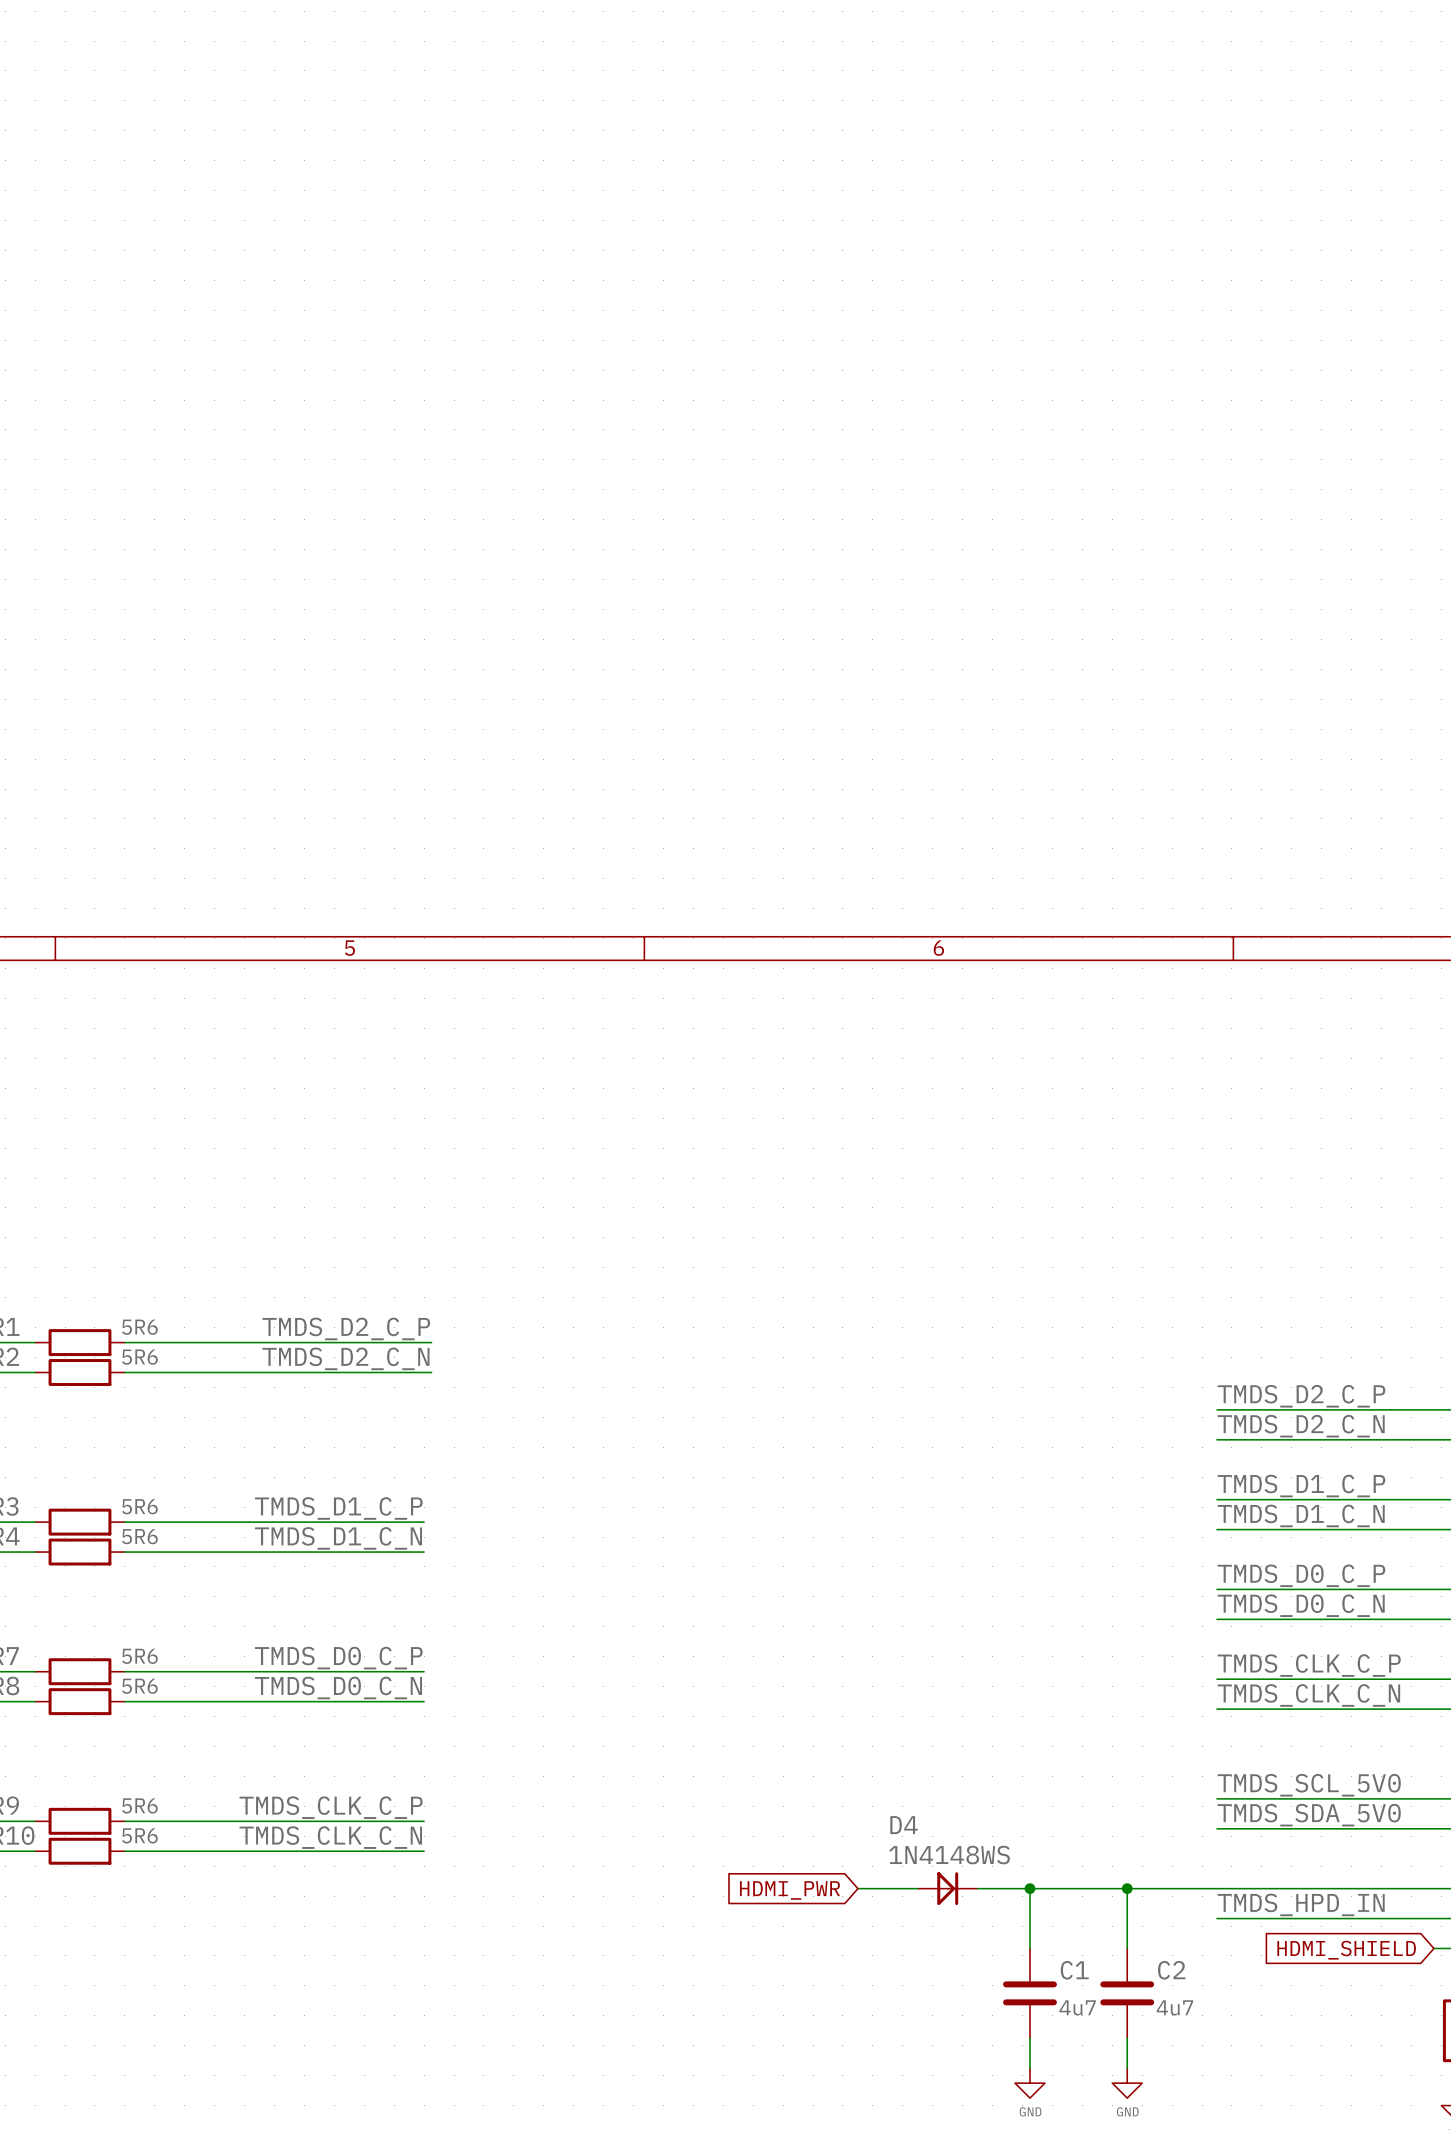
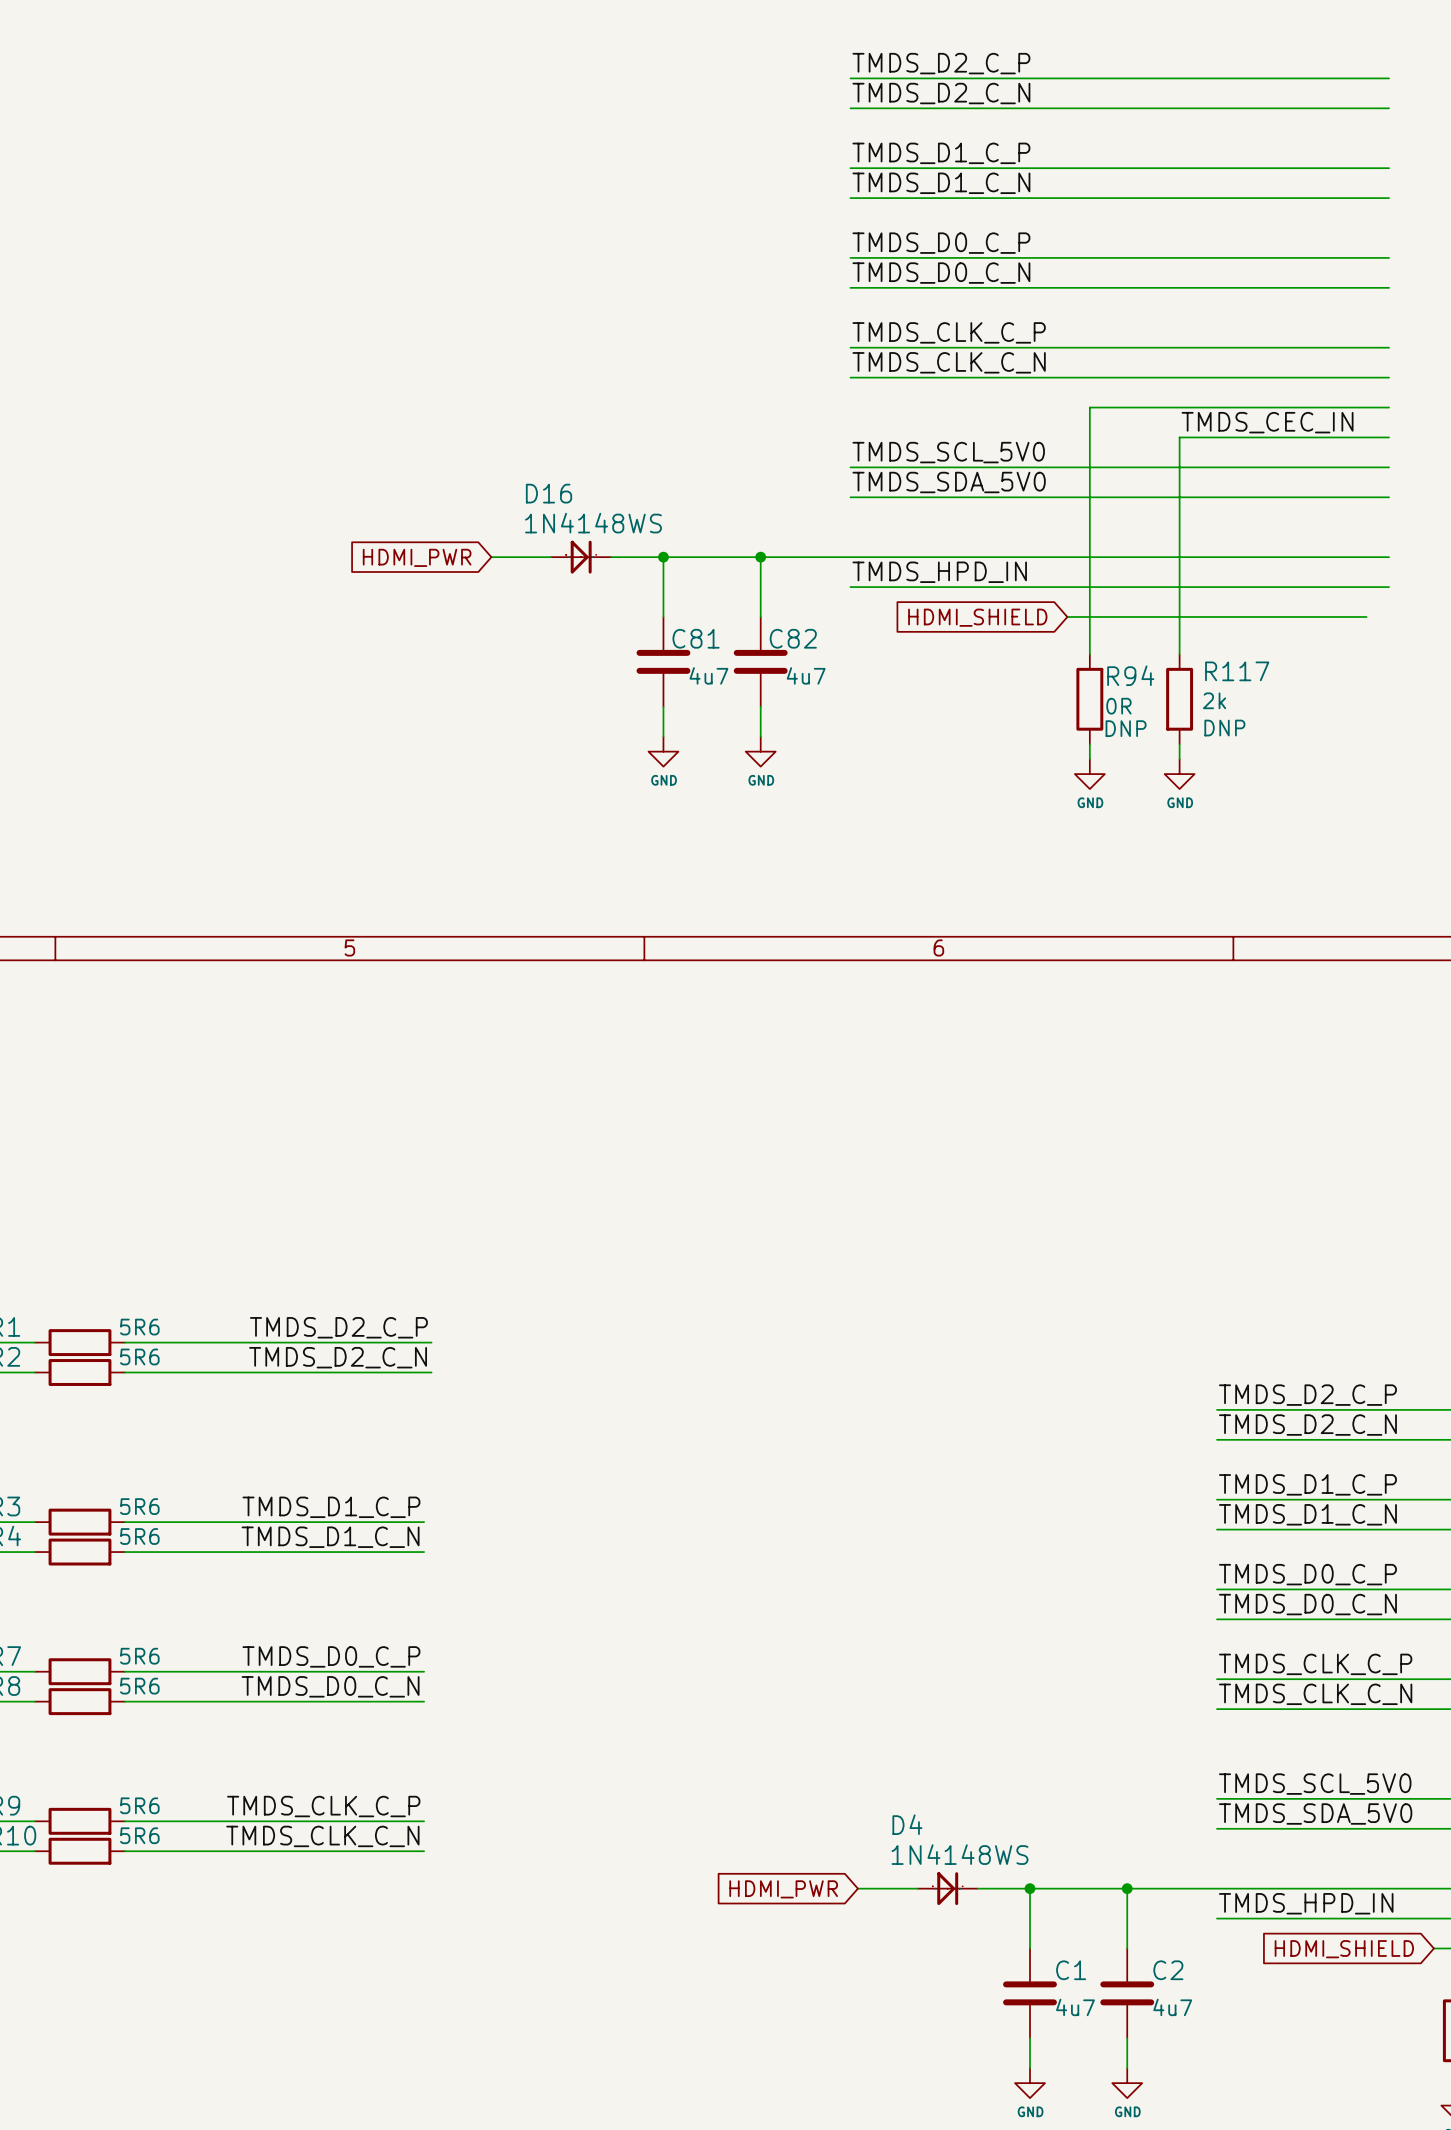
label: none -> TMDS_D2_C_P (941, 63)
wire: none -> (850, 78) (1389, 78)
label: none -> TMDS_D2_C_N (941, 93)
wire: none -> (850, 108) (1389, 108)
label: none -> TMDS_D1_C_P (941, 153)
wire: none -> (850, 168) (1389, 168)
label: none -> TMDS_D1_C_N (941, 183)
wire: none -> (850, 198) (1389, 198)
label: none -> TMDS_D0_C_P (941, 243)
wire: none -> (850, 257) (1389, 257)
label: none -> TMDS_D0_C_N (941, 273)
wire: none -> (850, 287) (1389, 287)
label: none -> TMDS_CLK_C_P (949, 332)
wire: none -> (850, 347) (1389, 347)
label: none -> TMDS_CLK_C_N (949, 362)
wire: none -> (850, 377) (1389, 377)
wire: none -> (1389, 407) (1089, 407) (1089, 654)
label: none -> TMDS_CEC_IN (1267, 422)
wire: none -> (1389, 437) (1179, 437) (1179, 654)
label: none -> TMDS_SCL_5V0 (948, 452)
wire: none -> (850, 467) (1389, 467)
label: none -> TMDS_SDA_5V0 (949, 482)
wire: none -> (850, 497) (1389, 497)
wire: none -> (491, 557) (551, 557)
D16: none -> 1N4148WS (581, 557)
wire: none -> (611, 557) (1389, 557)
wire: none -> (663, 557) (663, 616)
junction: none -> (663, 557)
wire: none -> (760, 557) (760, 616)
junction: none -> (760, 557)
global label: none -> HDMI_PWR (417, 557)
label: none -> TMDS_HPD_IN (939, 572)
wire: none -> (850, 587) (1389, 587)
wire: none -> (1067, 616) (1366, 616)
global label: none -> HDMI_SHIELD (977, 617)
C81: none -> (663, 661)
C82: none -> (760, 661)
R94: none -> (1089, 699)
R117: none -> (1179, 699)
wire: none -> (663, 706) (663, 736)
wire: none -> (760, 706) (760, 736)
wire: none -> (1089, 744) (1089, 759)
wire: none -> (1179, 744) (1179, 759)
power symbol: none -> GND (663, 751)
power symbol: none -> GND (760, 751)
power symbol: none -> GND (1089, 774)
power symbol: none -> GND (1179, 774)

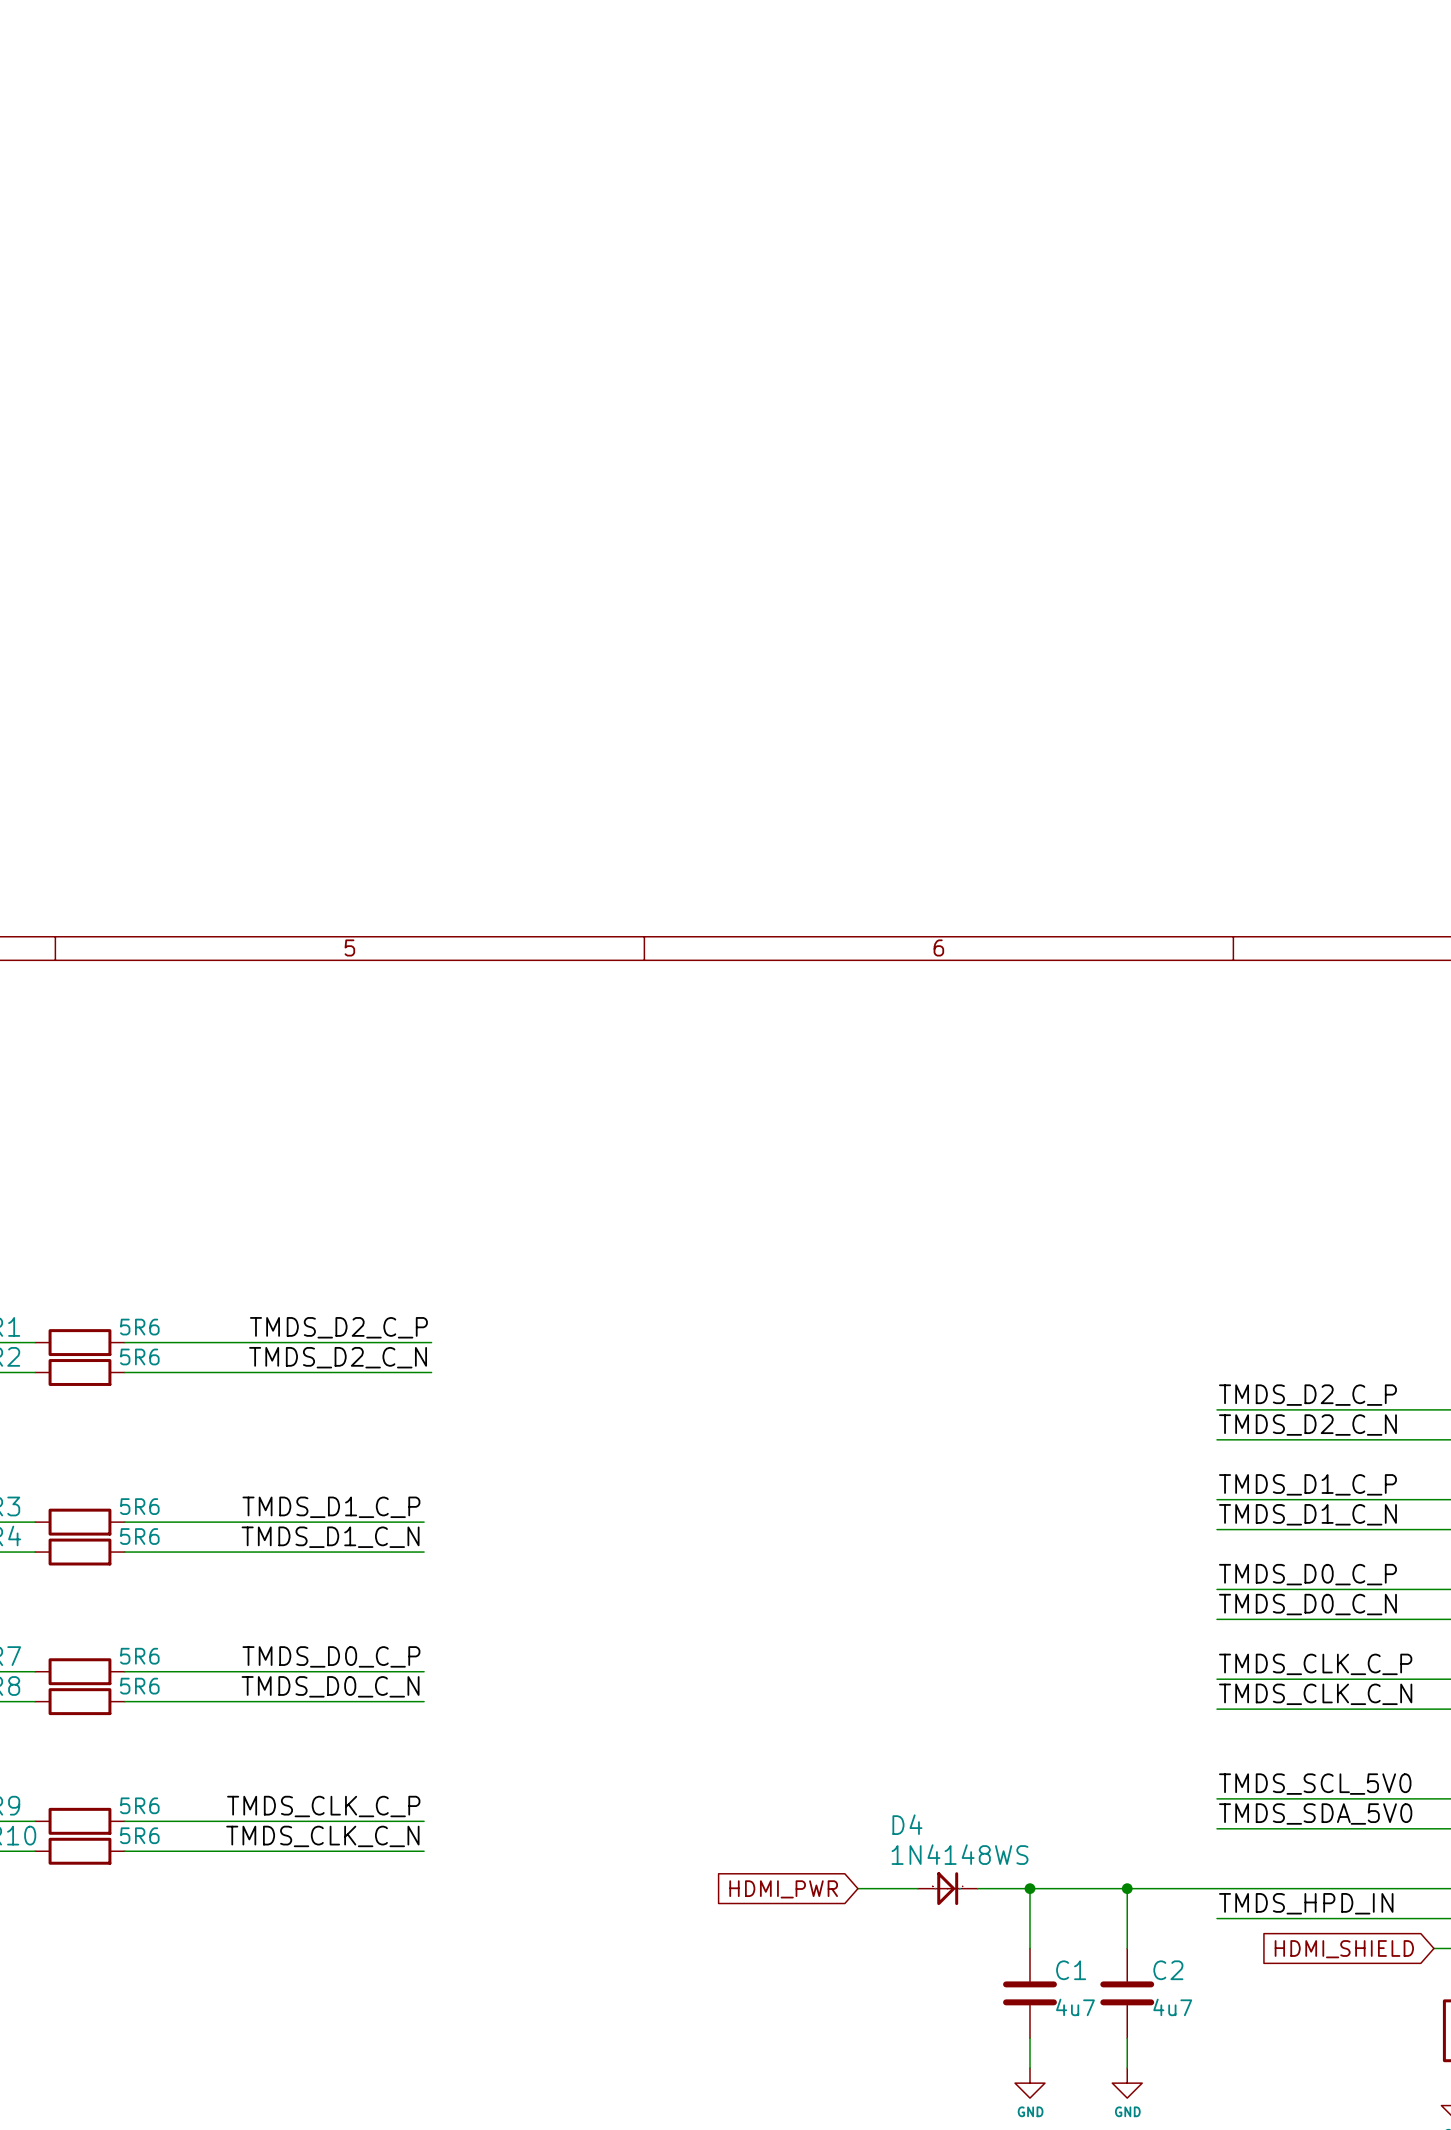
label: TMDS_D2_C_P (941, 63) -> none
wire: (850, 78) (1389, 78) -> none
label: TMDS_D2_C_N (941, 93) -> none
wire: (850, 108) (1389, 108) -> none
label: TMDS_D1_C_P (941, 153) -> none
wire: (850, 168) (1389, 168) -> none
label: TMDS_D1_C_N (941, 183) -> none
wire: (850, 198) (1389, 198) -> none
label: TMDS_D0_C_P (941, 243) -> none
wire: (850, 257) (1389, 257) -> none
label: TMDS_D0_C_N (941, 273) -> none
wire: (850, 287) (1389, 287) -> none
label: TMDS_CLK_C_P (949, 332) -> none
wire: (850, 347) (1389, 347) -> none
label: TMDS_CLK_C_N (949, 362) -> none
wire: (850, 377) (1389, 377) -> none
wire: (1389, 407) (1089, 407) (1089, 654) -> none
label: TMDS_CEC_IN (1267, 422) -> none
wire: (1389, 437) (1179, 437) (1179, 654) -> none
label: TMDS_SCL_5V0 (948, 452) -> none
wire: (850, 467) (1389, 467) -> none
label: TMDS_SDA_5V0 (949, 482) -> none
wire: (850, 497) (1389, 497) -> none
global label: HDMI_PWR (417, 557) -> none
wire: (491, 557) (551, 557) -> none
D16: 1N4148WS (581, 557) -> none
wire: (611, 557) (1389, 557) -> none
wire: (663, 557) (663, 616) -> none
junction: (663, 557) -> none
wire: (760, 557) (760, 616) -> none
junction: (760, 557) -> none
label: TMDS_HPD_IN (939, 572) -> none
wire: (850, 587) (1389, 587) -> none
wire: (1067, 616) (1366, 616) -> none
global label: HDMI_SHIELD (977, 617) -> none
C81: (663, 661) -> none
C82: (760, 661) -> none
R94: (1089, 699) -> none
R117: (1179, 699) -> none
wire: (663, 706) (663, 736) -> none
wire: (760, 706) (760, 736) -> none
wire: (1089, 744) (1089, 759) -> none
wire: (1179, 744) (1179, 759) -> none
power symbol: GND (663, 751) -> none
power symbol: GND (760, 751) -> none
power symbol: GND (1089, 774) -> none
power symbol: GND (1179, 774) -> none

